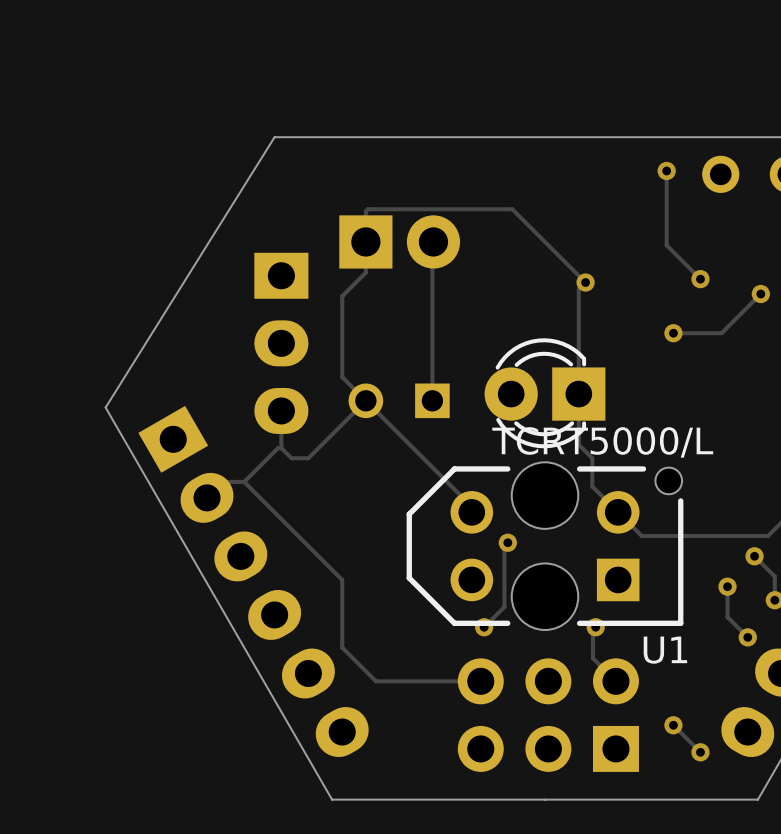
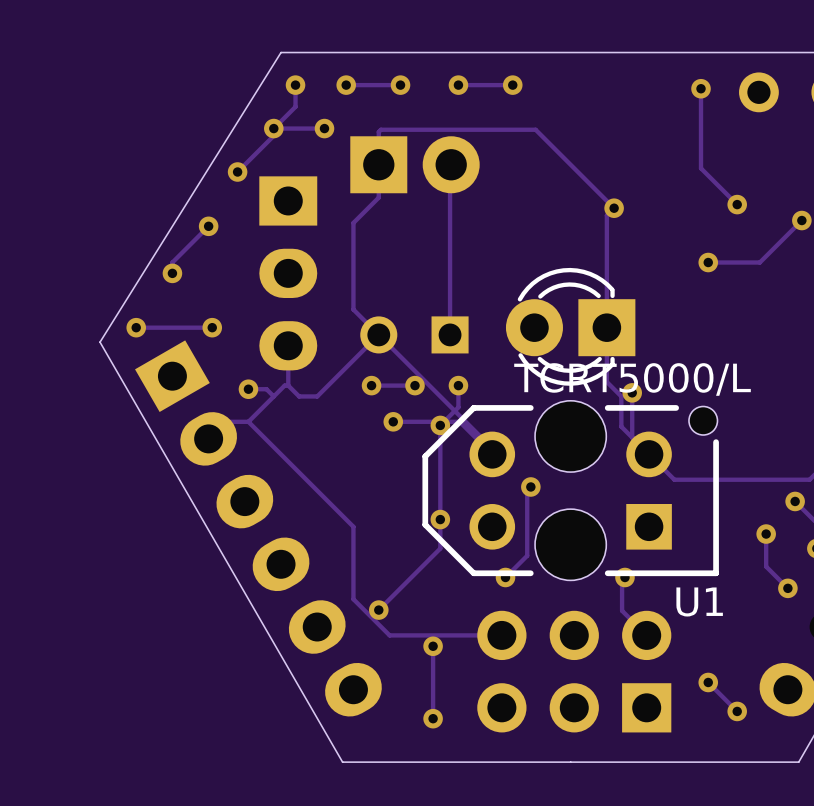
track: none -> (295, 85) (295, 106) (273, 128)
via: none -> (295, 85)
via: none -> (346, 85)
track: none -> (400, 85) (346, 85)
via: none -> (400, 85)
via: none -> (458, 85)
track: none -> (512, 85) (458, 85)
via: none -> (512, 85)
via: none -> (273, 128)
track: none -> (324, 128) (281, 128) (237, 172)
via: none -> (324, 128)
via: none -> (237, 172)
track: none -> (208, 226) (172, 262) (172, 273)
via: none -> (208, 226)
via: none -> (172, 273)
via: none -> (136, 327)
track: none -> (212, 327) (136, 327)
via: none -> (212, 327)
via: none -> (371, 385)
track: none -> (414, 385) (371, 385)
via: none -> (414, 385)
track: none -> (458, 385) (458, 407) (440, 425) (440, 548) (378, 610)
via: none -> (458, 385)
track: none -> (248, 389) (266, 389) (273, 396)
via: none -> (248, 389)
track: none -> (632, 392) (632, 437)
via: none -> (632, 392)
track: none -> (393, 421) (459, 421) (492, 454)
via: none -> (393, 421)
via: none -> (440, 425)
via: none -> (440, 519)
via: none -> (378, 610)
track: none -> (433, 646) (433, 718)
via: none -> (433, 646)
via: none -> (433, 718)

